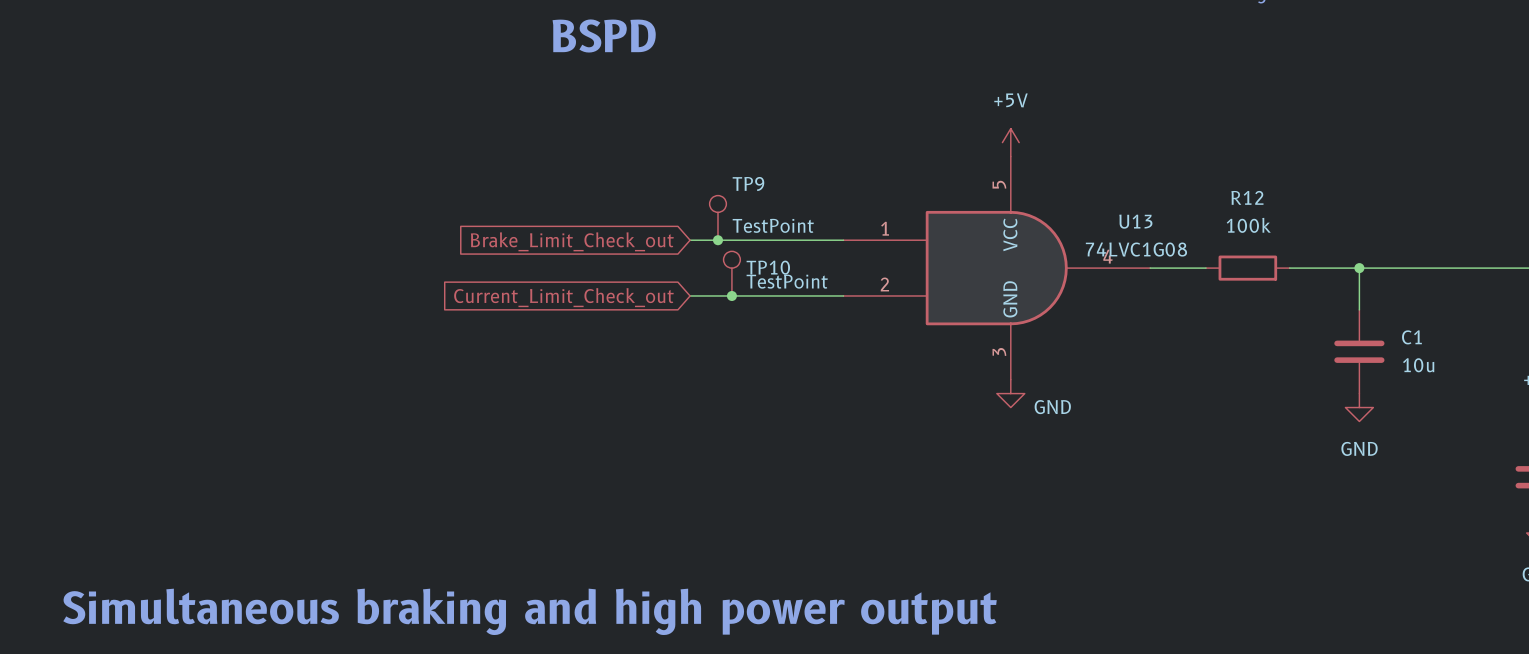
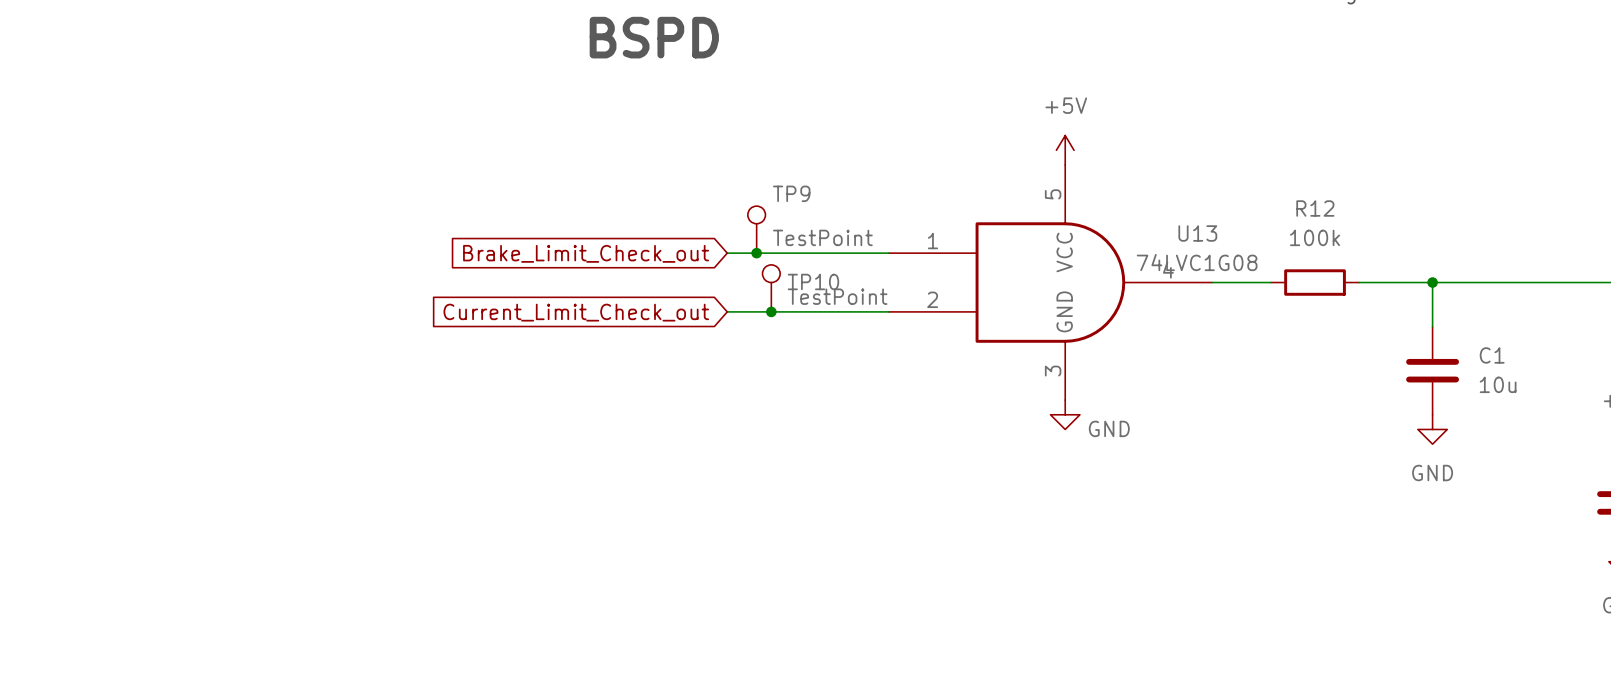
text: Simultaneous braking and high power output (530, 611) -> none

